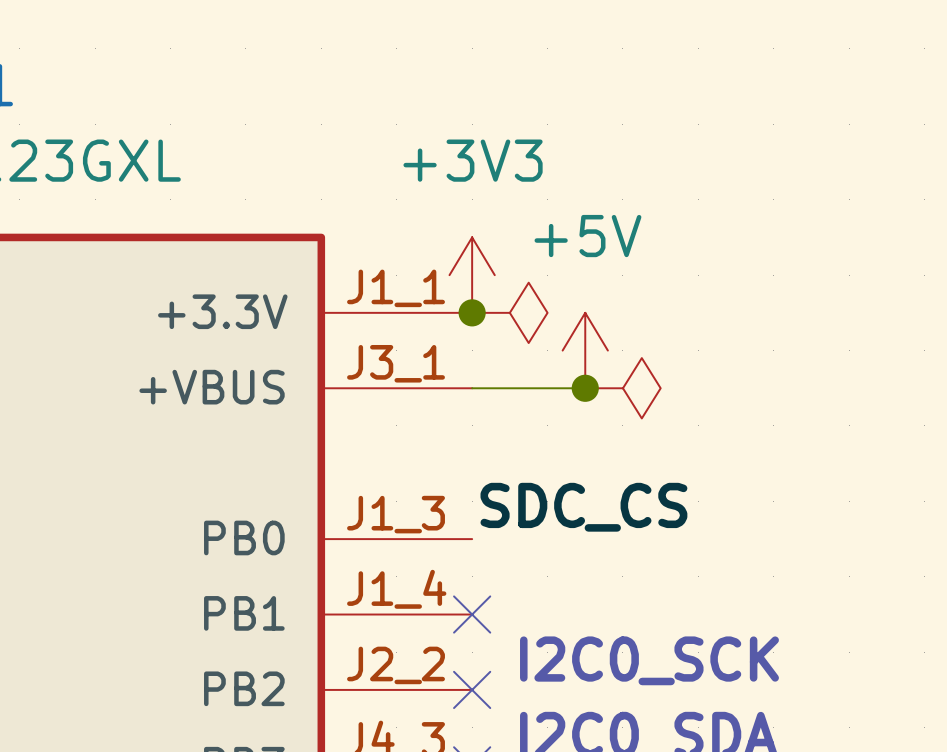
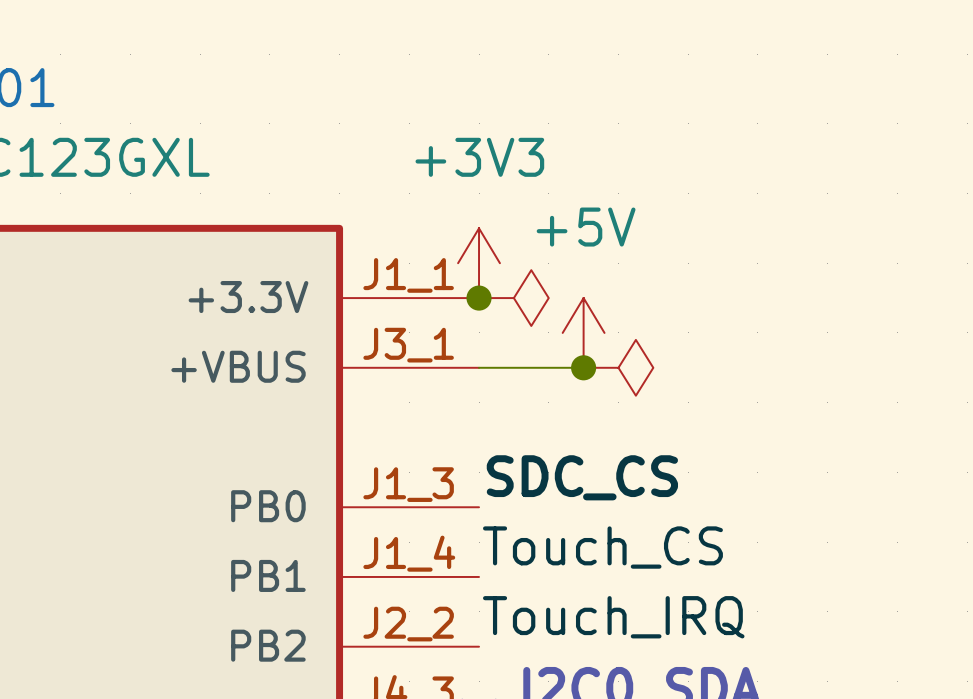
label: none -> Touch_CS (602, 547)
no-connect mark: (472, 614) -> none
label: none -> Touch_IRQ (613, 617)
text: I2C0_SCK (649, 660) -> none
no-connect mark: (472, 689) -> none

